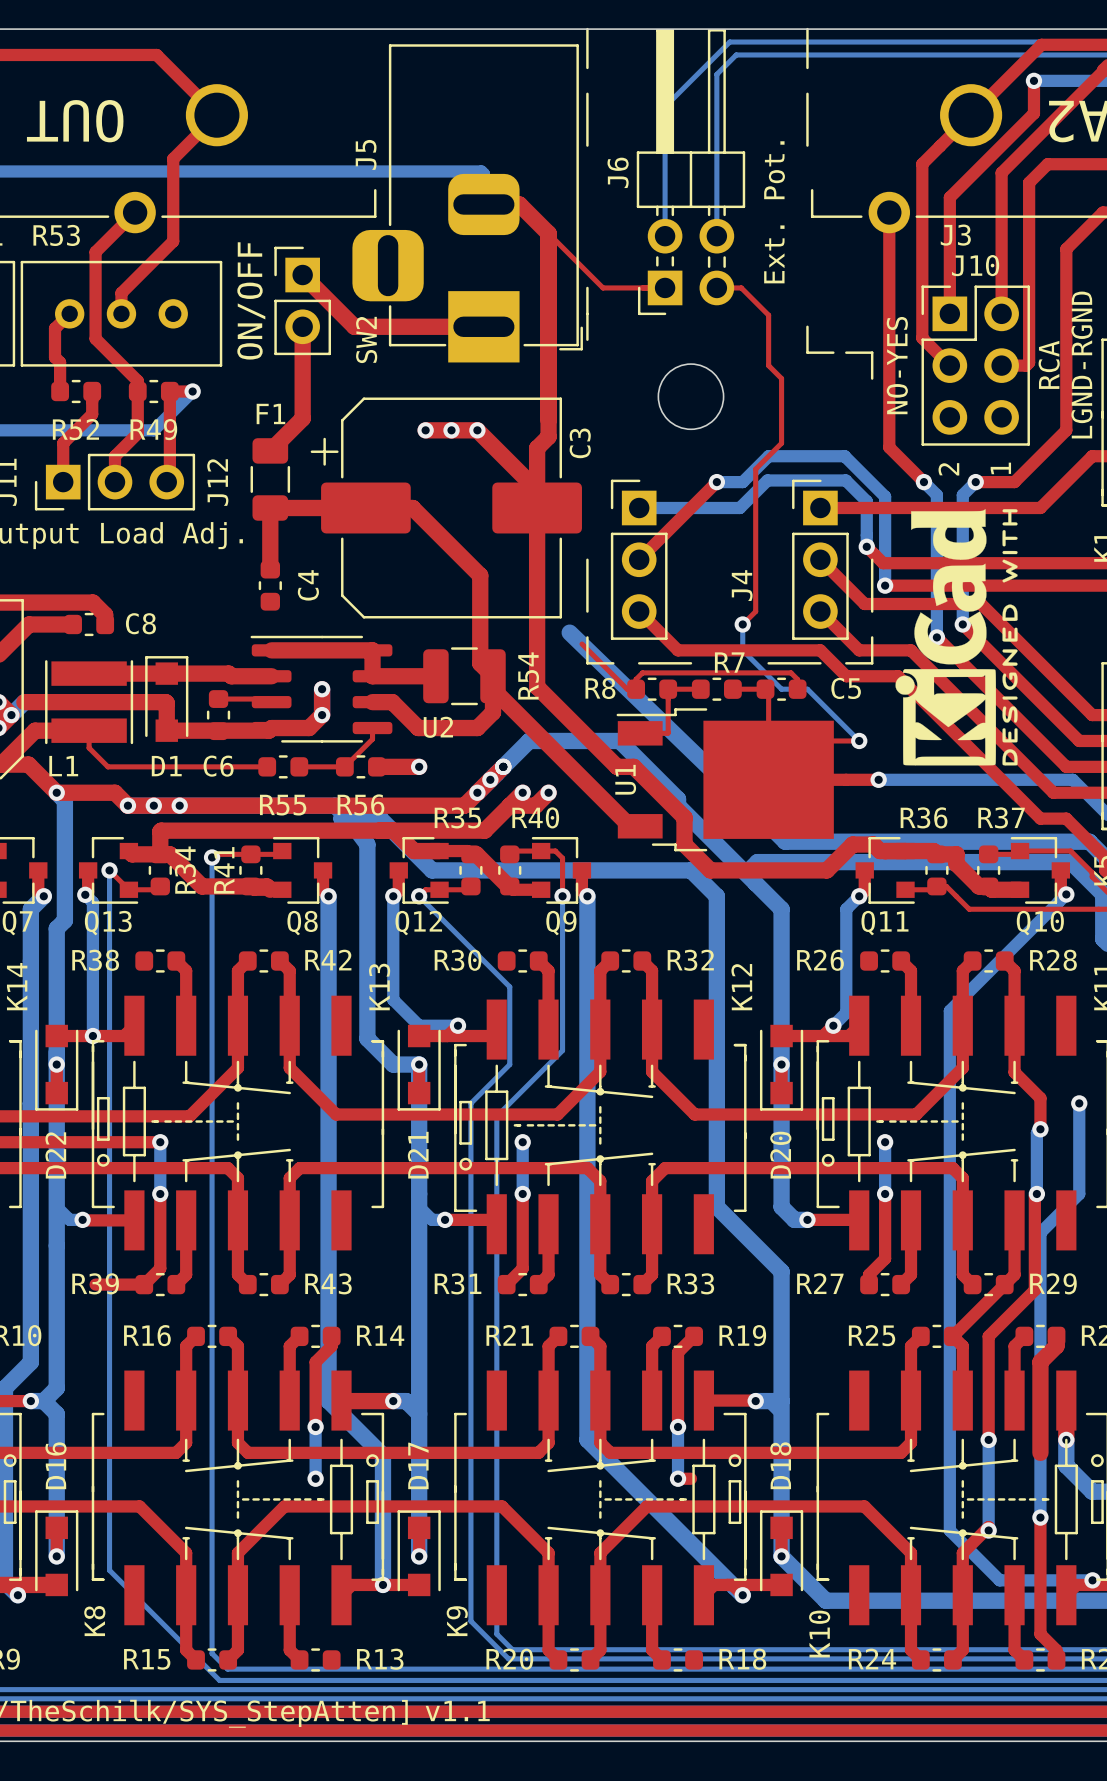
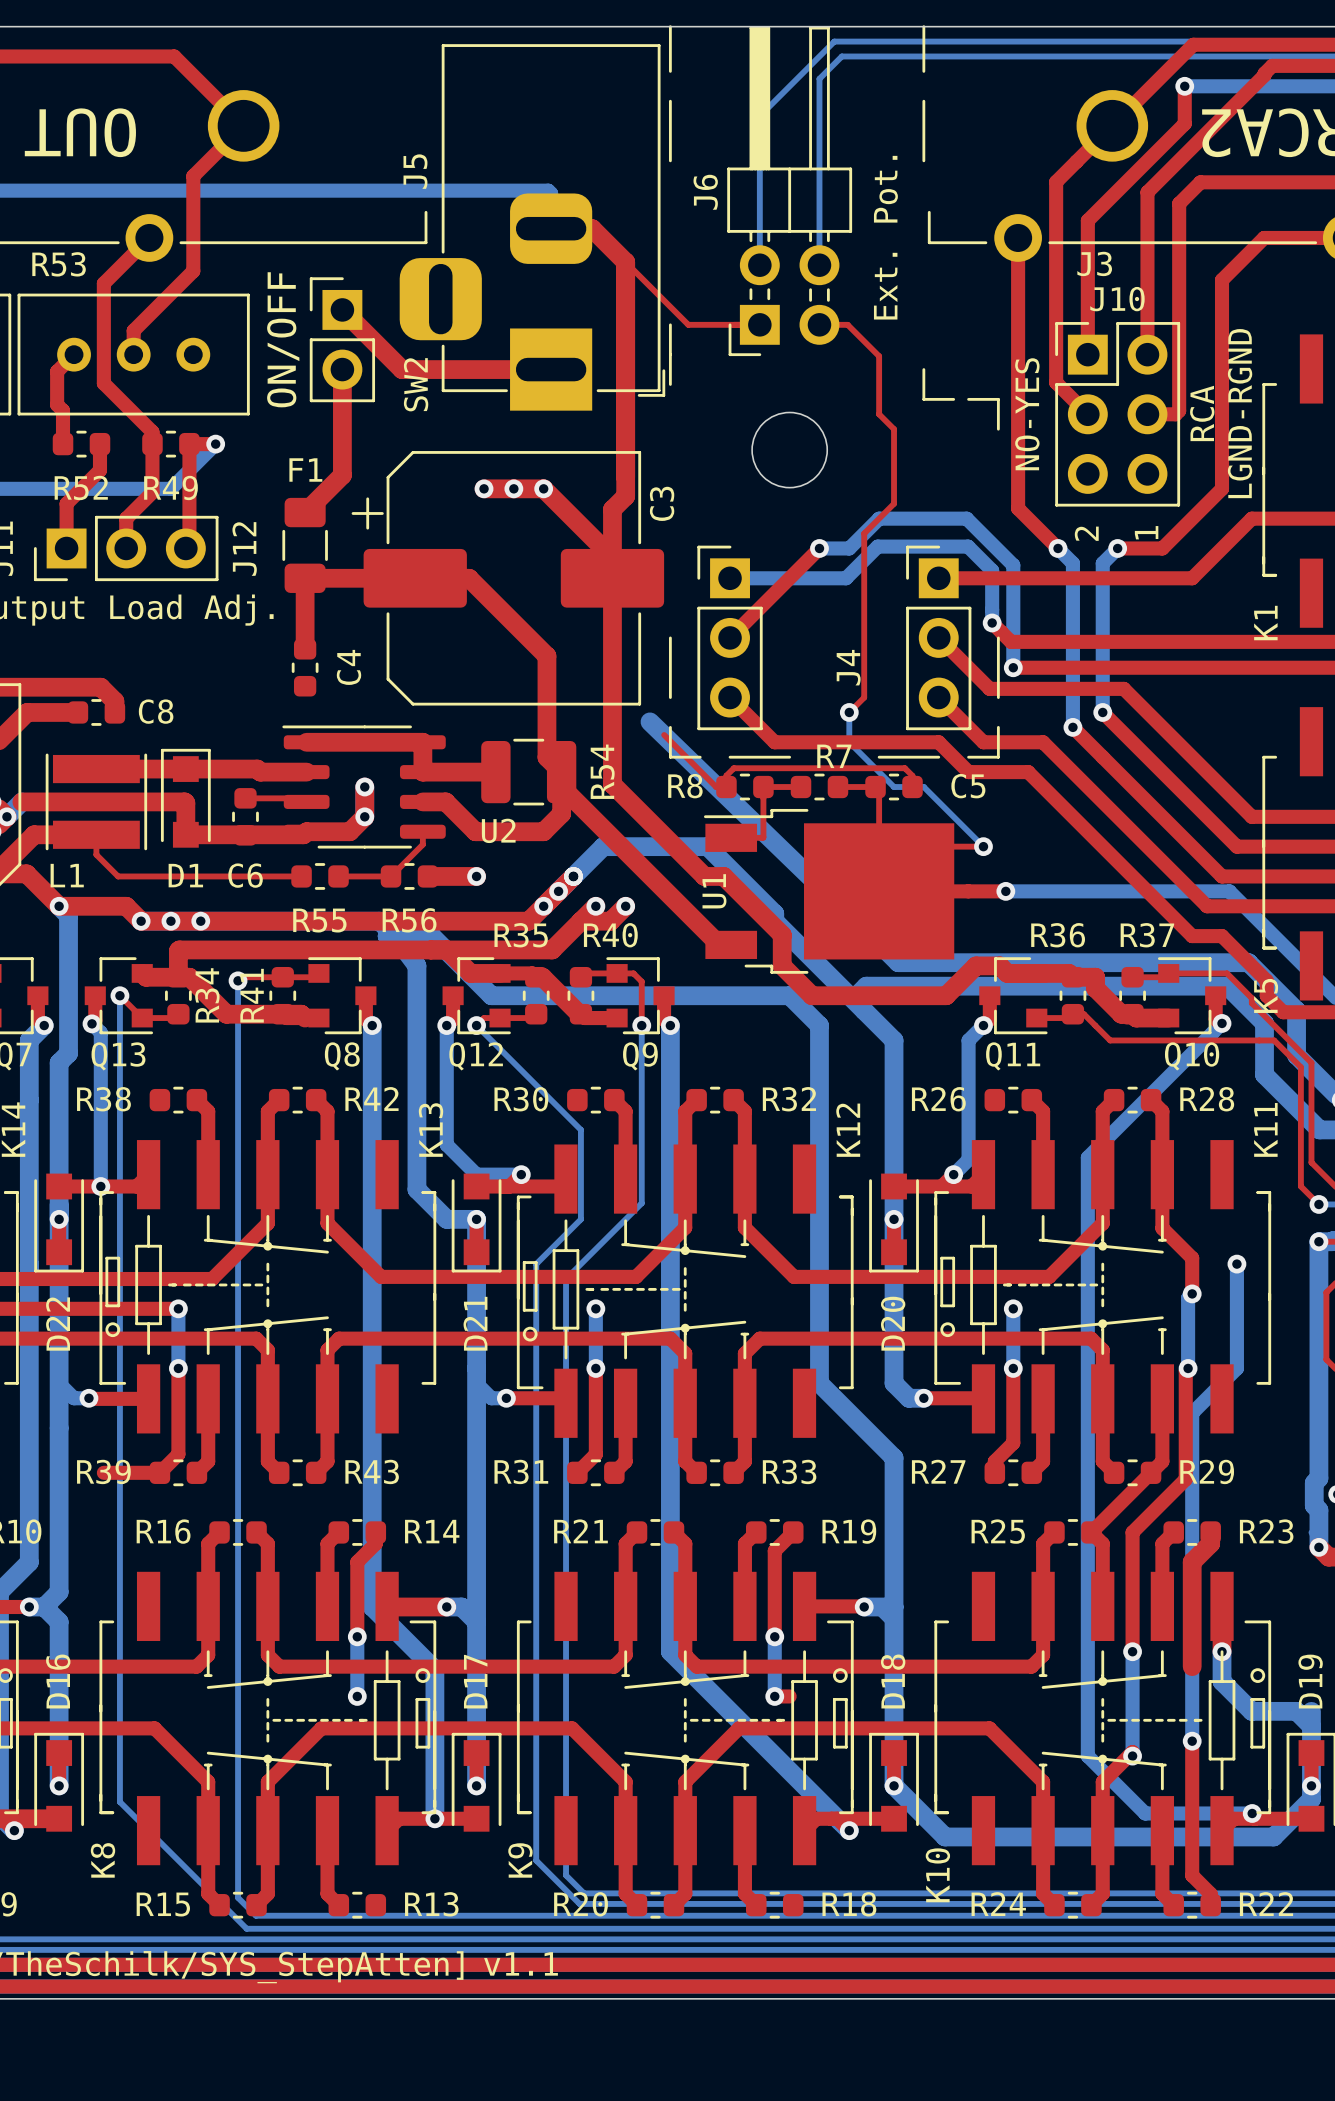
drawing: [895, 509, 1018, 766] -> none

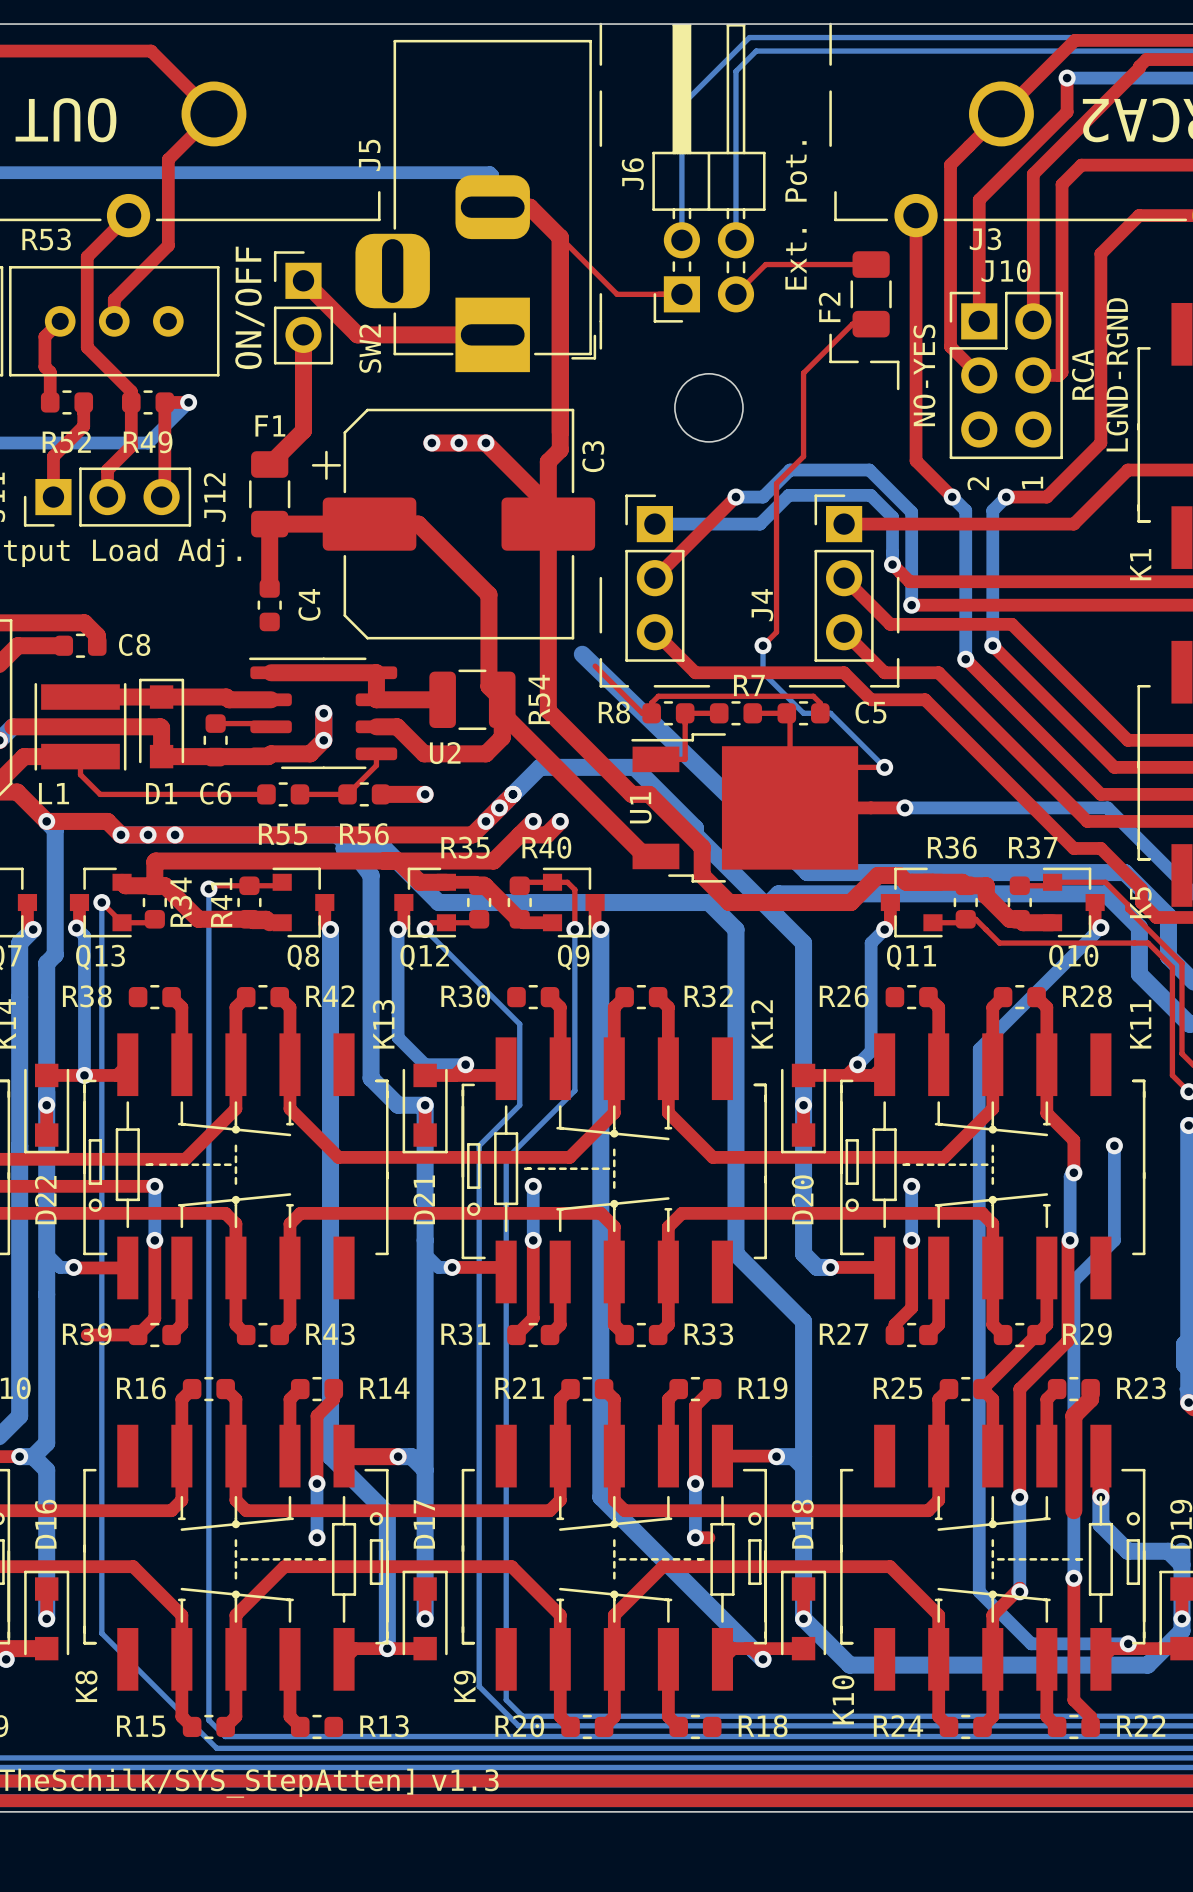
top track: none -> (871, 264) (765, 264) (735, 294)
top track: (819, 324) (847, 324) (879, 356) (879, 414) (894, 429) -> (871, 324) (852, 324) (803, 373) (803, 388)
F2: none -> (871, 294)
text: v1.1 (521, 1963) -> v1.3 (465, 1780)

